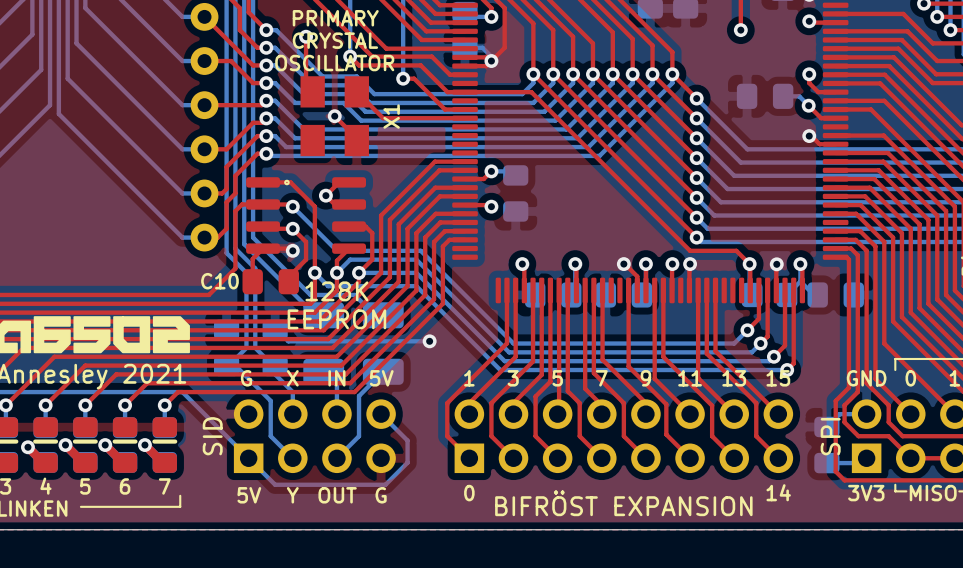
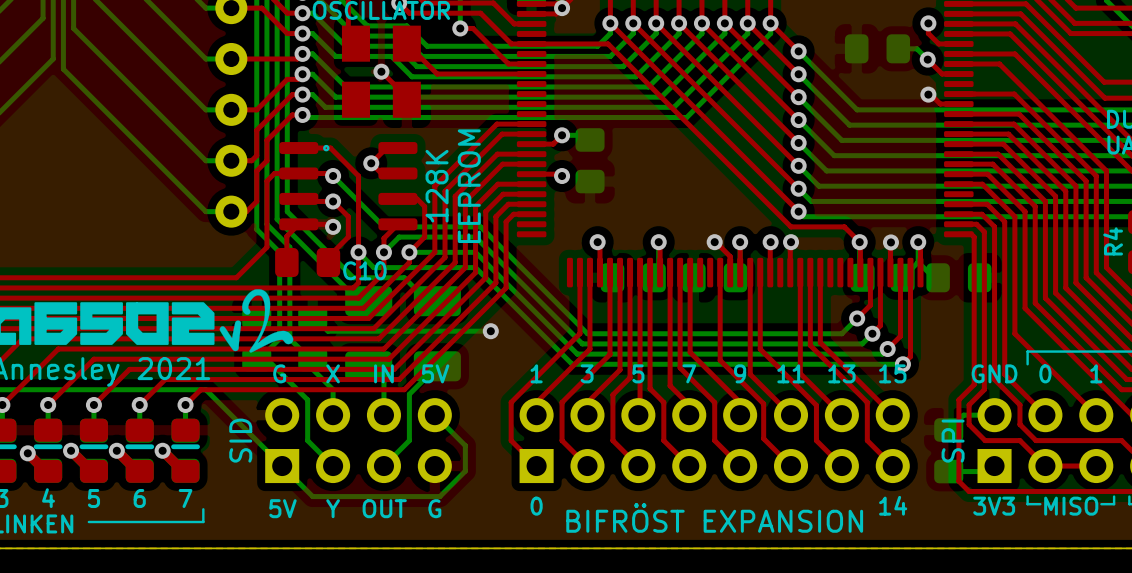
X1 name: X1 (391, 116) -> none
C10 name position: C10 (219, 281) -> C10 (364, 270)
text rotation: 0° (336, 291) -> 90° counterclockwise (437, 186)
text position: 128K (336, 291) -> 128K (437, 186)
drawing: none -> [219, 289, 294, 353]
text rotation: 0° (336, 319) -> 90° counterclockwise (469, 186)
text position: EEPROM (336, 319) -> EEPROM (469, 186)

